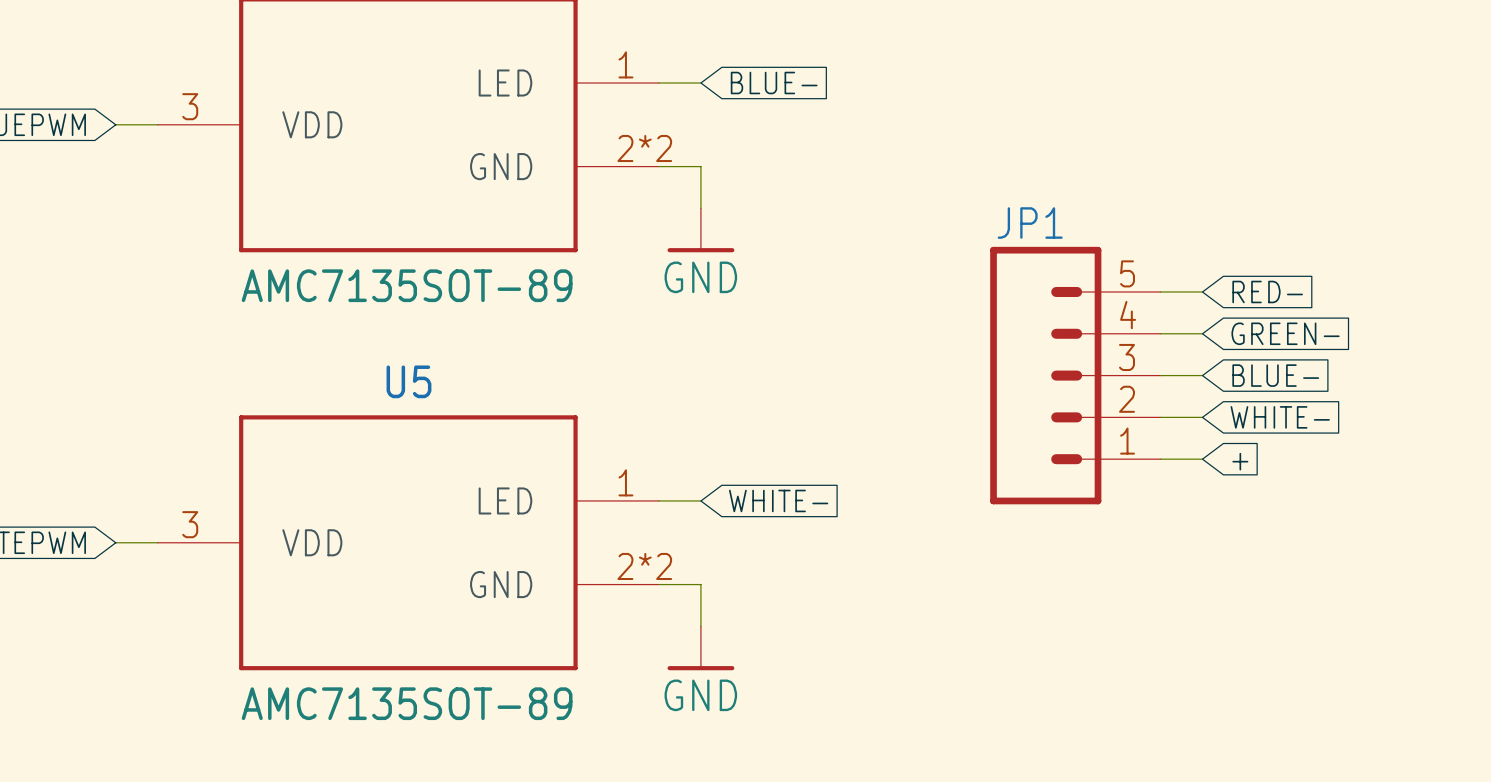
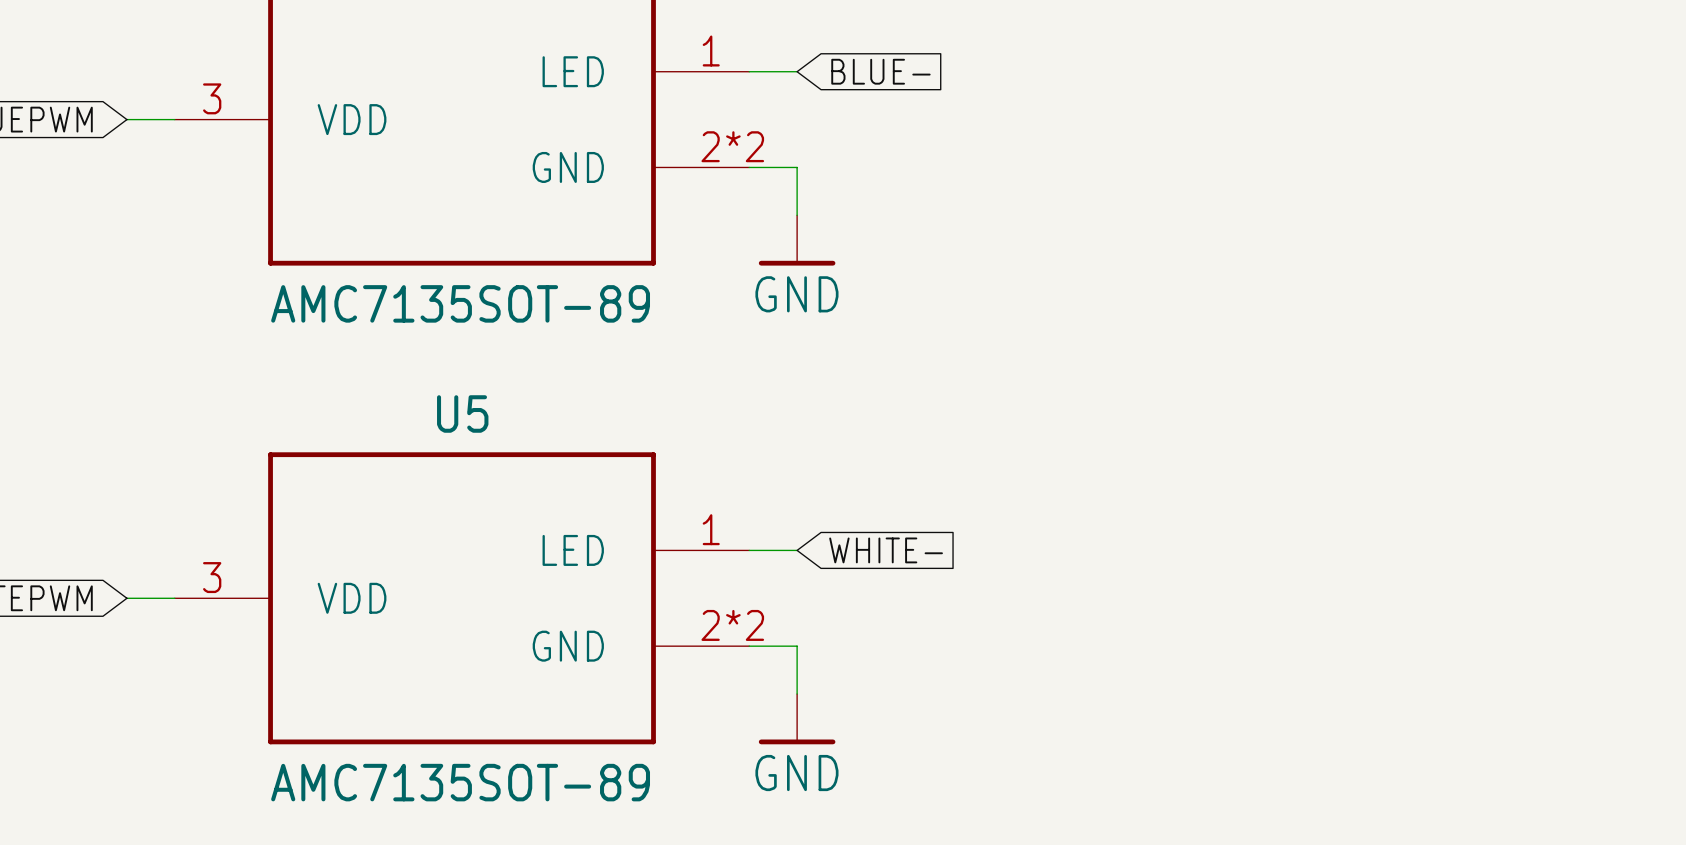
wire: (1160, 291) (1202, 291) -> none
global label: RED- (1267, 291) -> none
wire: (1160, 333) (1202, 333) -> none
global label: GREEN- (1285, 333) -> none
JP1: (1075, 375) -> none
wire: (1160, 375) (1202, 375) -> none
global label: BLUE- (1275, 375) -> none
wire: (1160, 417) (1202, 417) -> none
global label: WHITE- (1280, 417) -> none
wire: (1160, 459) (1202, 459) -> none
global label: + (1240, 461) -> none

